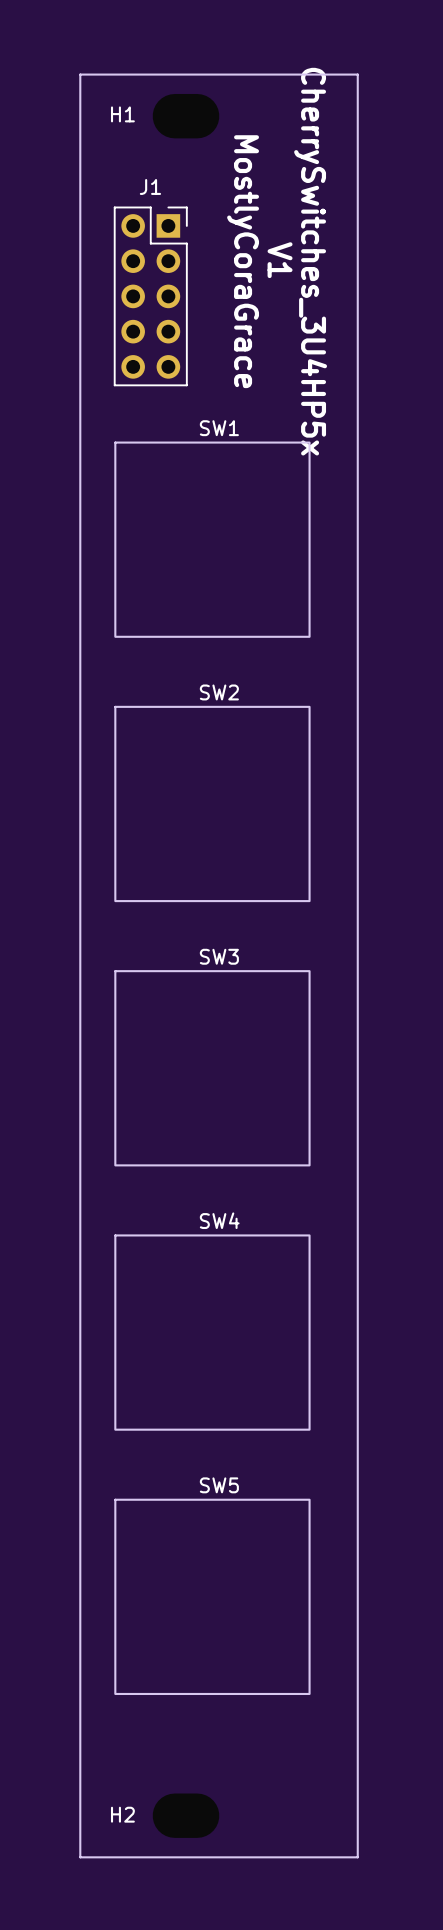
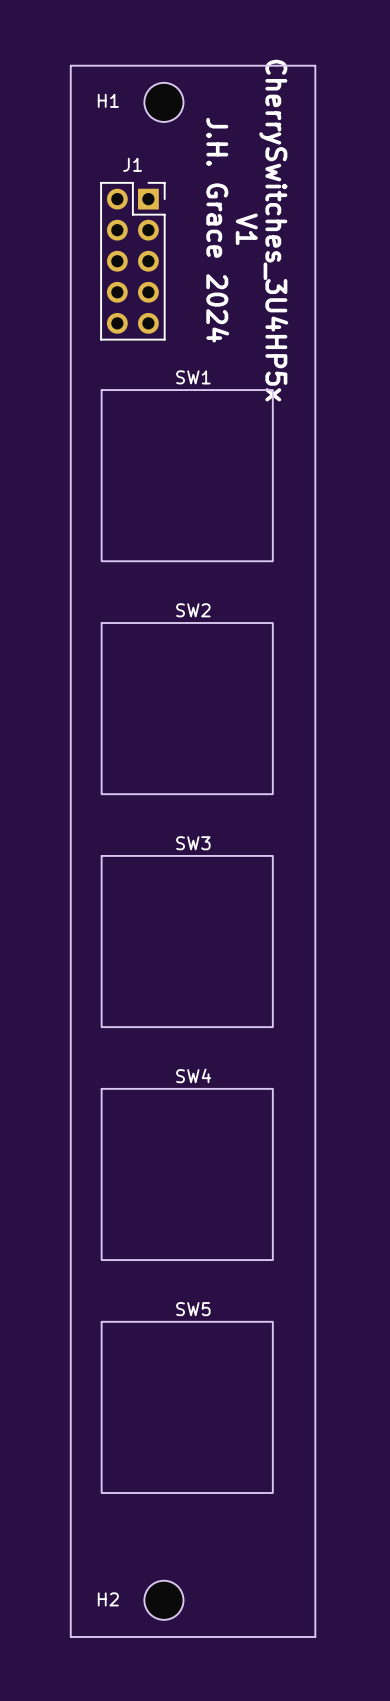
H1 footprint: [152, 93, 220, 139] -> [144, 82, 184, 122]
text: MostlyCoraGrace (243, 261) -> J.H. Grace 2024 (217, 230)
H2 footprint: [152, 1793, 220, 1838] -> [144, 1580, 184, 1620]

